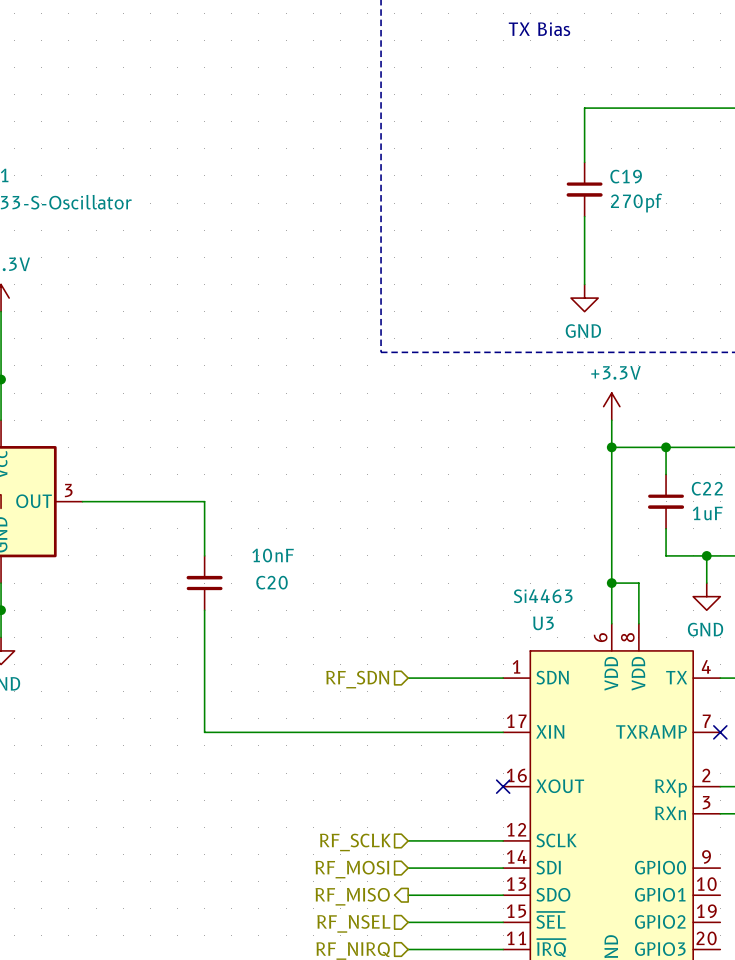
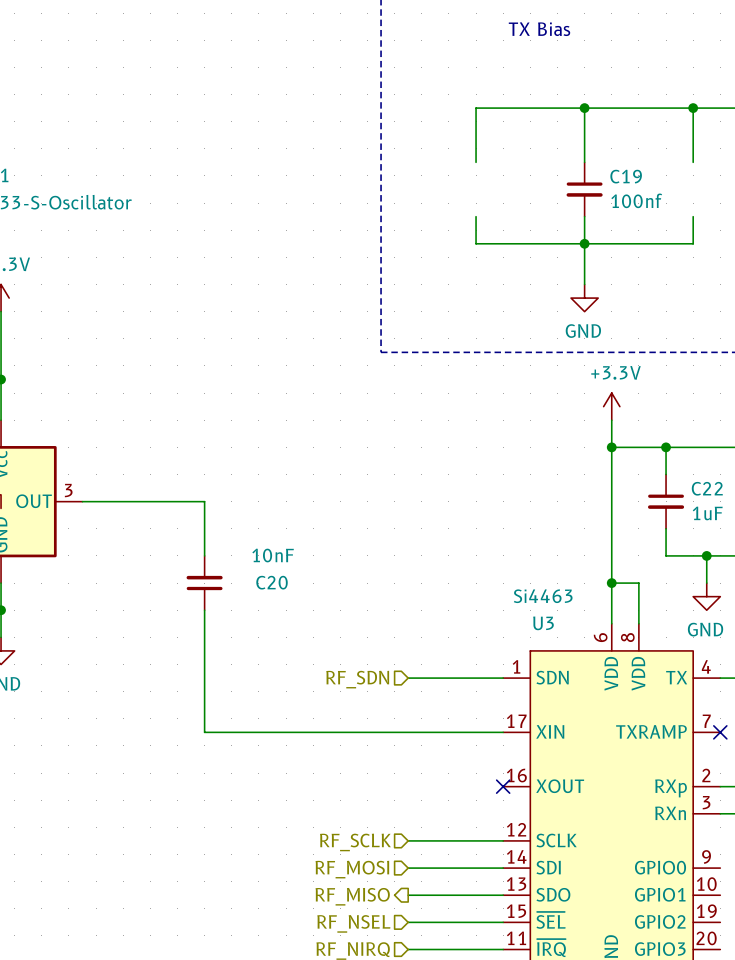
wire: none -> (584, 108) (476, 108) (476, 162)
junction: none -> (584, 108)
wire: none -> (693, 108) (693, 162)
junction: none -> (693, 108)
C19 value: 270pf (636, 203) -> 100nf (636, 200)
wire: none -> (476, 216) (476, 243) (693, 243) (693, 216)
junction: none -> (584, 243)

